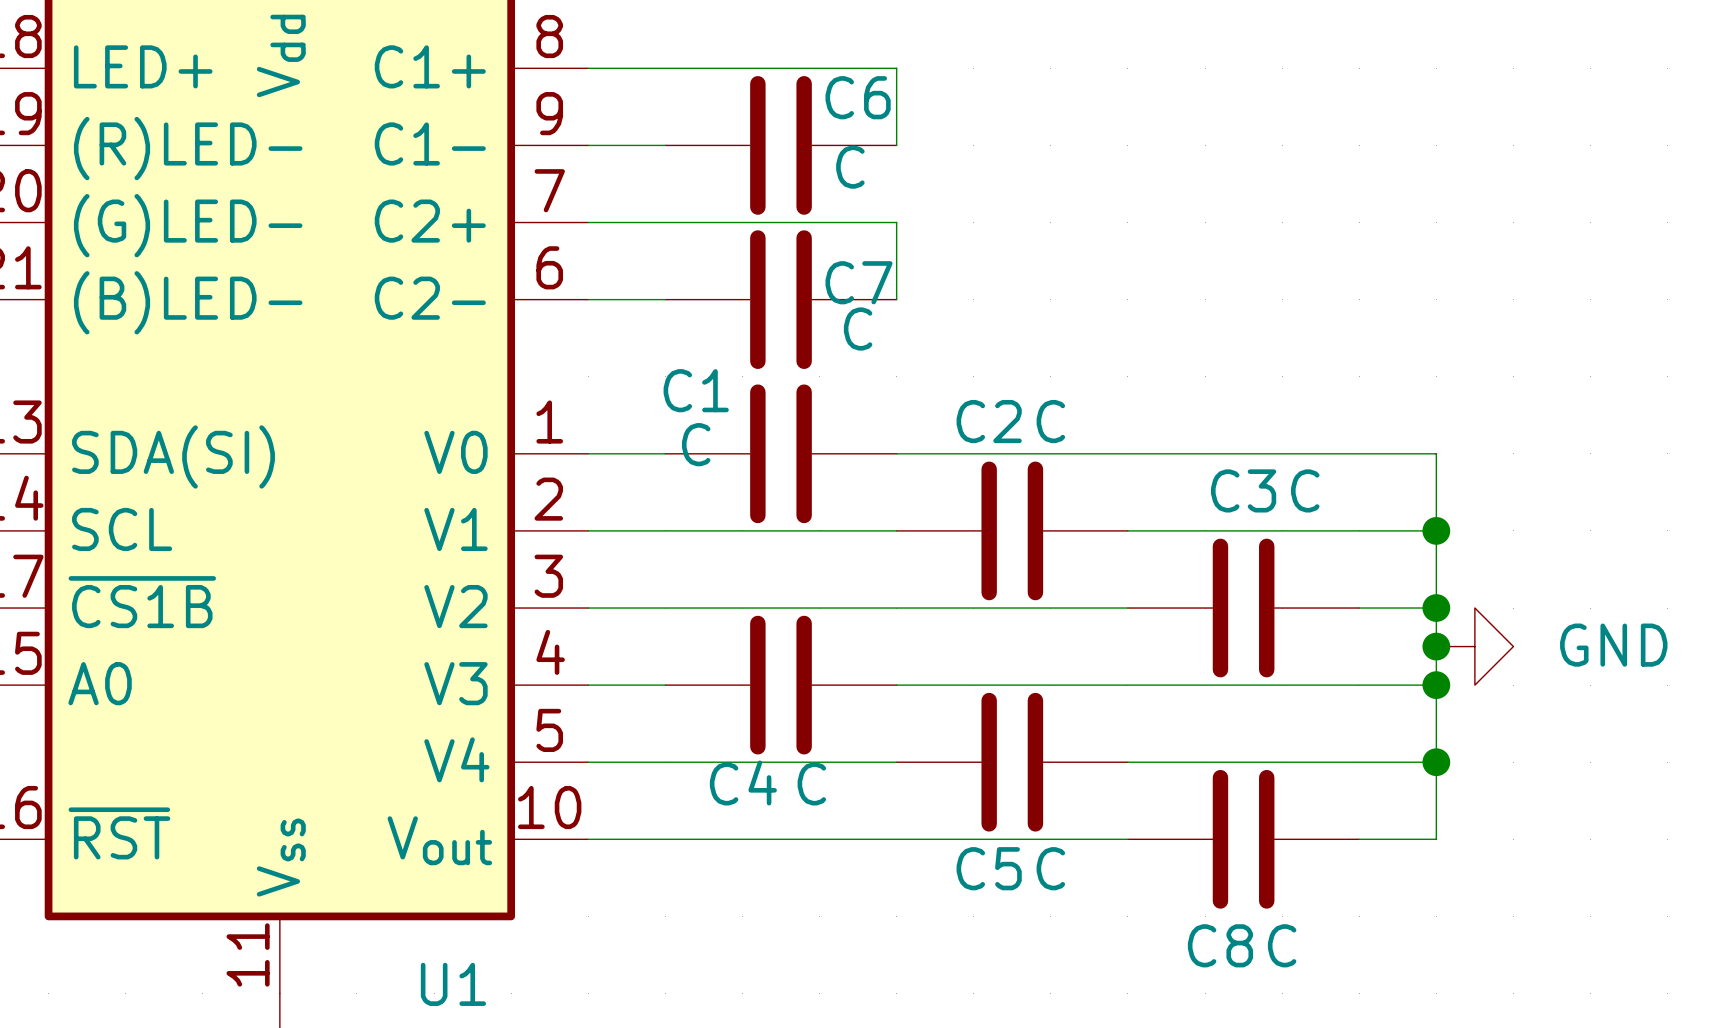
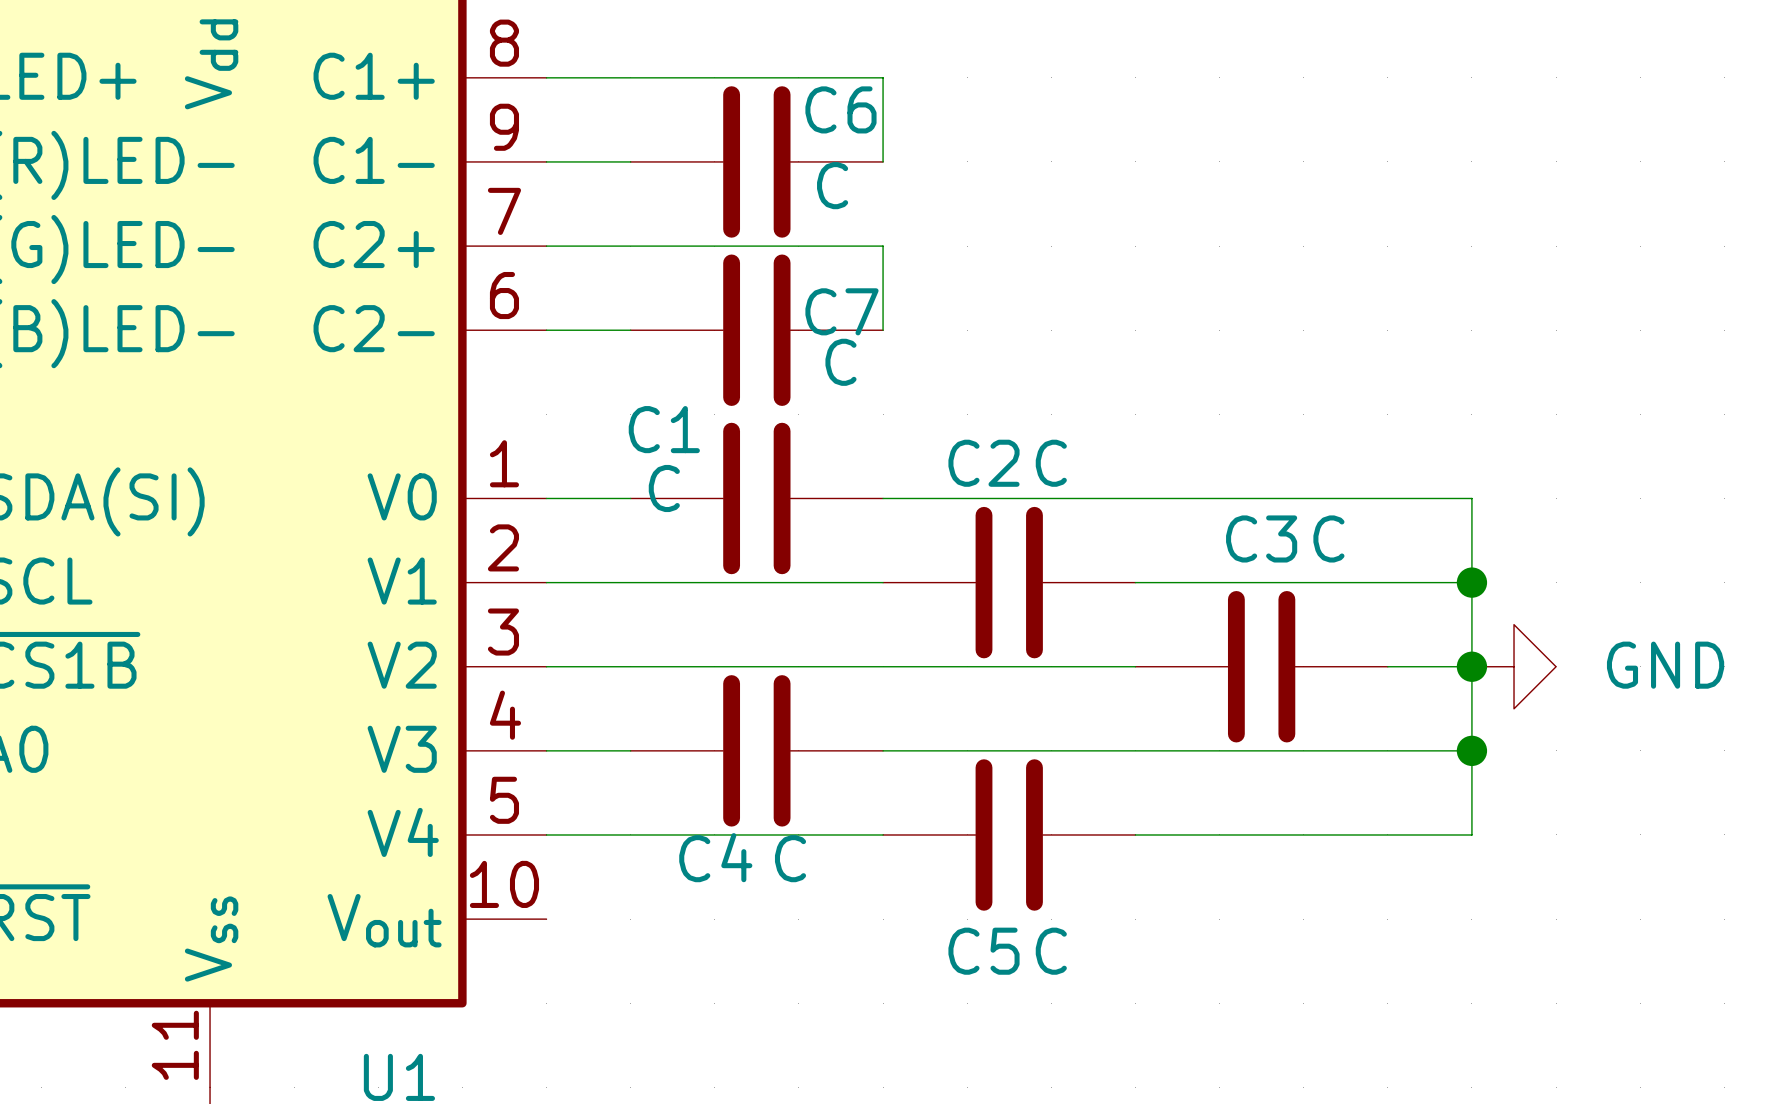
junction: (1436, 646) -> none
power symbol position: GND (1474, 646) -> GND (1514, 666)
wire: (1436, 762) (1436, 839) (1359, 839) -> none
junction: (1436, 762) -> none
wire: (588, 839) (1127, 839) -> none
C8: C (1243, 839) -> none

